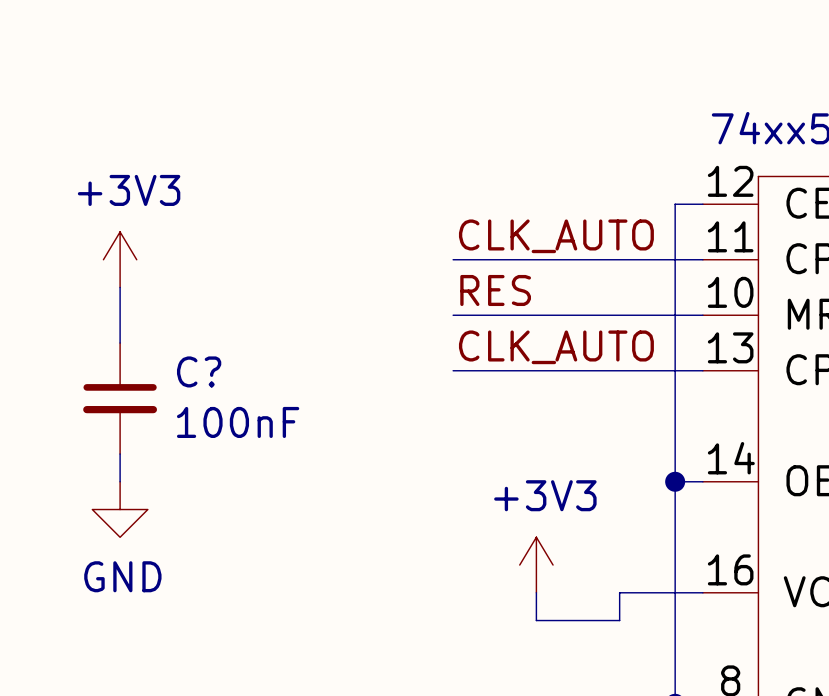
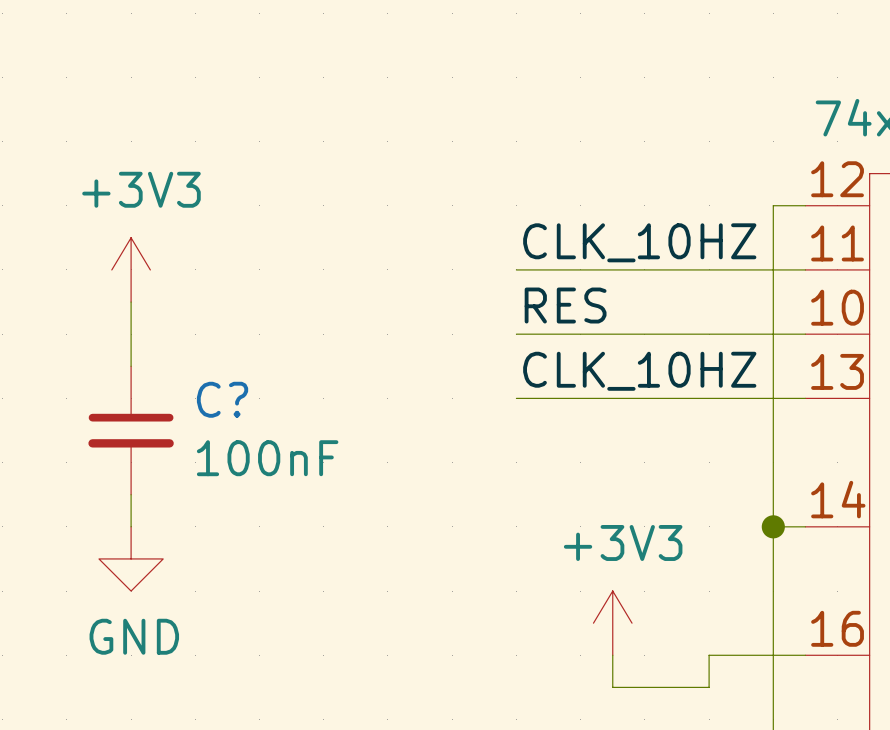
label: CLK_AUTO (556, 236) -> CLK_10HZ (639, 242)
label: CLK_AUTO (556, 347) -> CLK_10HZ (639, 371)

